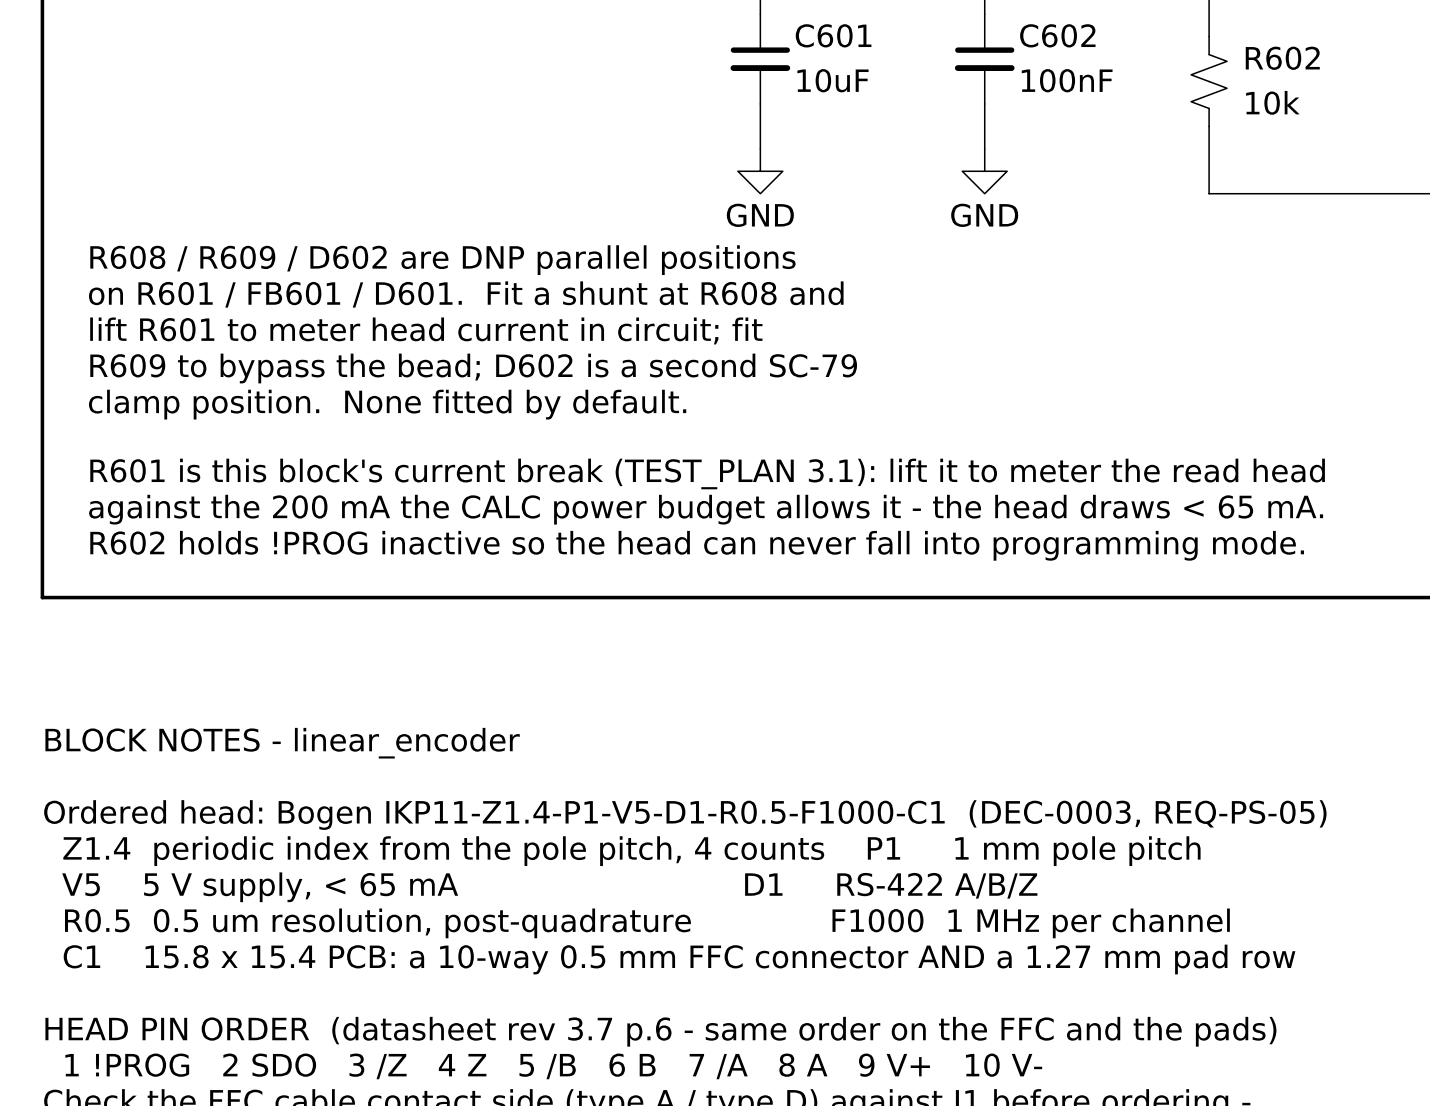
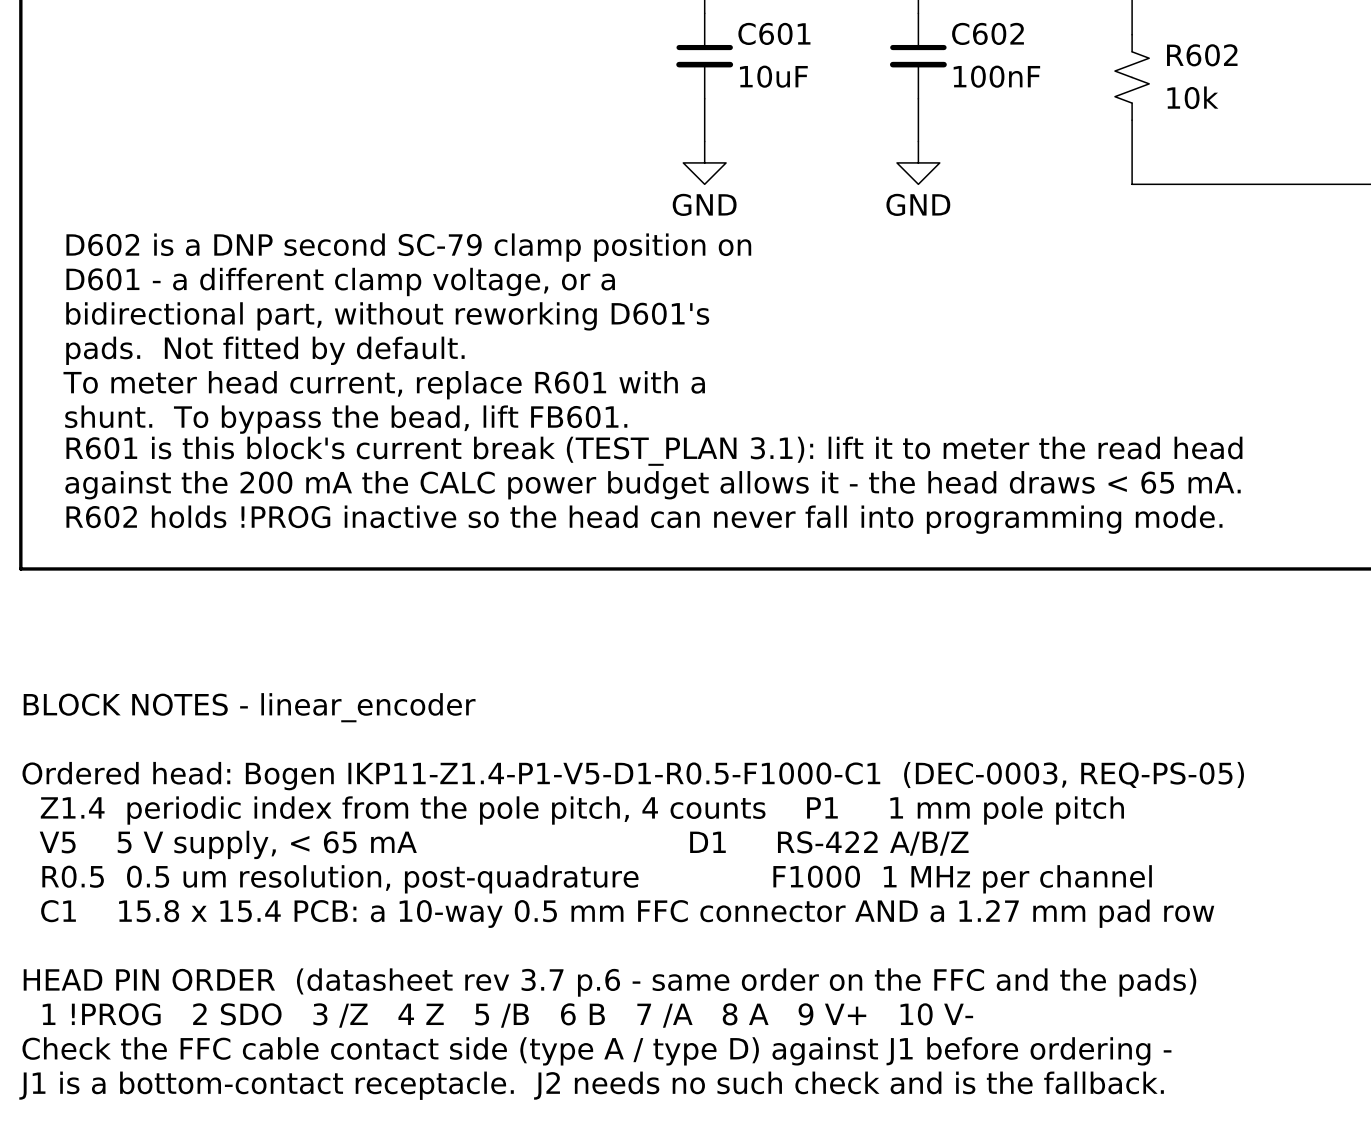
text: R608 / R609 / D602 are DNP parallel positions (442, 260) -> D602 is a DNP second SC-79 clamp position on (408, 247)
text: on R601 / FB601 / D601. Fit a shunt at R608 and (466, 294) -> D601 - a different clamp voltage, or a (340, 281)
text: lift R601 to meter head current in circuit; fit (426, 330) -> bidirectional part, without reworking D601's (387, 316)
text: R609 to bypass the bead; D602 is a second SC-79 (473, 368) -> pads. Not fitted by default. (265, 350)
text: clamp position. None fitted by default. (387, 404) -> To meter head current, replace R601 with a (384, 385)
text: none -> shunt. To bypass the bead, lift FB601. (346, 419)

